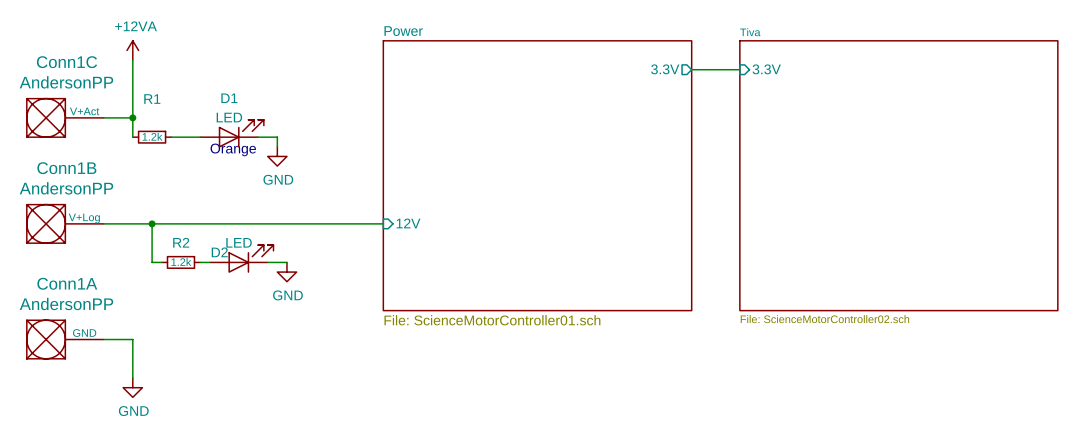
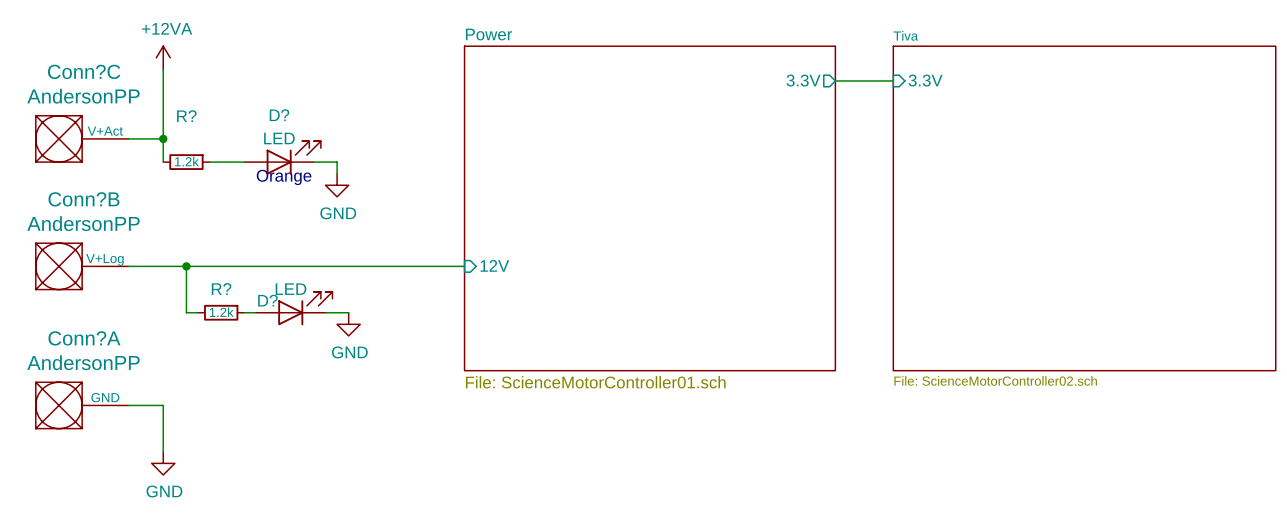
Conn1C name: Conn1C (67, 62) -> Conn?C (84, 71)
D1 name: D1 (229, 98) -> D? (279, 115)
R1 name: R1 (152, 99) -> R? (186, 116)
Conn1B name: Conn1B (66, 168) -> Conn?B (83, 199)
R2 name: R2 (181, 242) -> R? (221, 289)
D2 name: D2 (219, 252) -> D? (267, 300)
Conn1A name: Conn1A (67, 283) -> Conn?A (84, 338)

